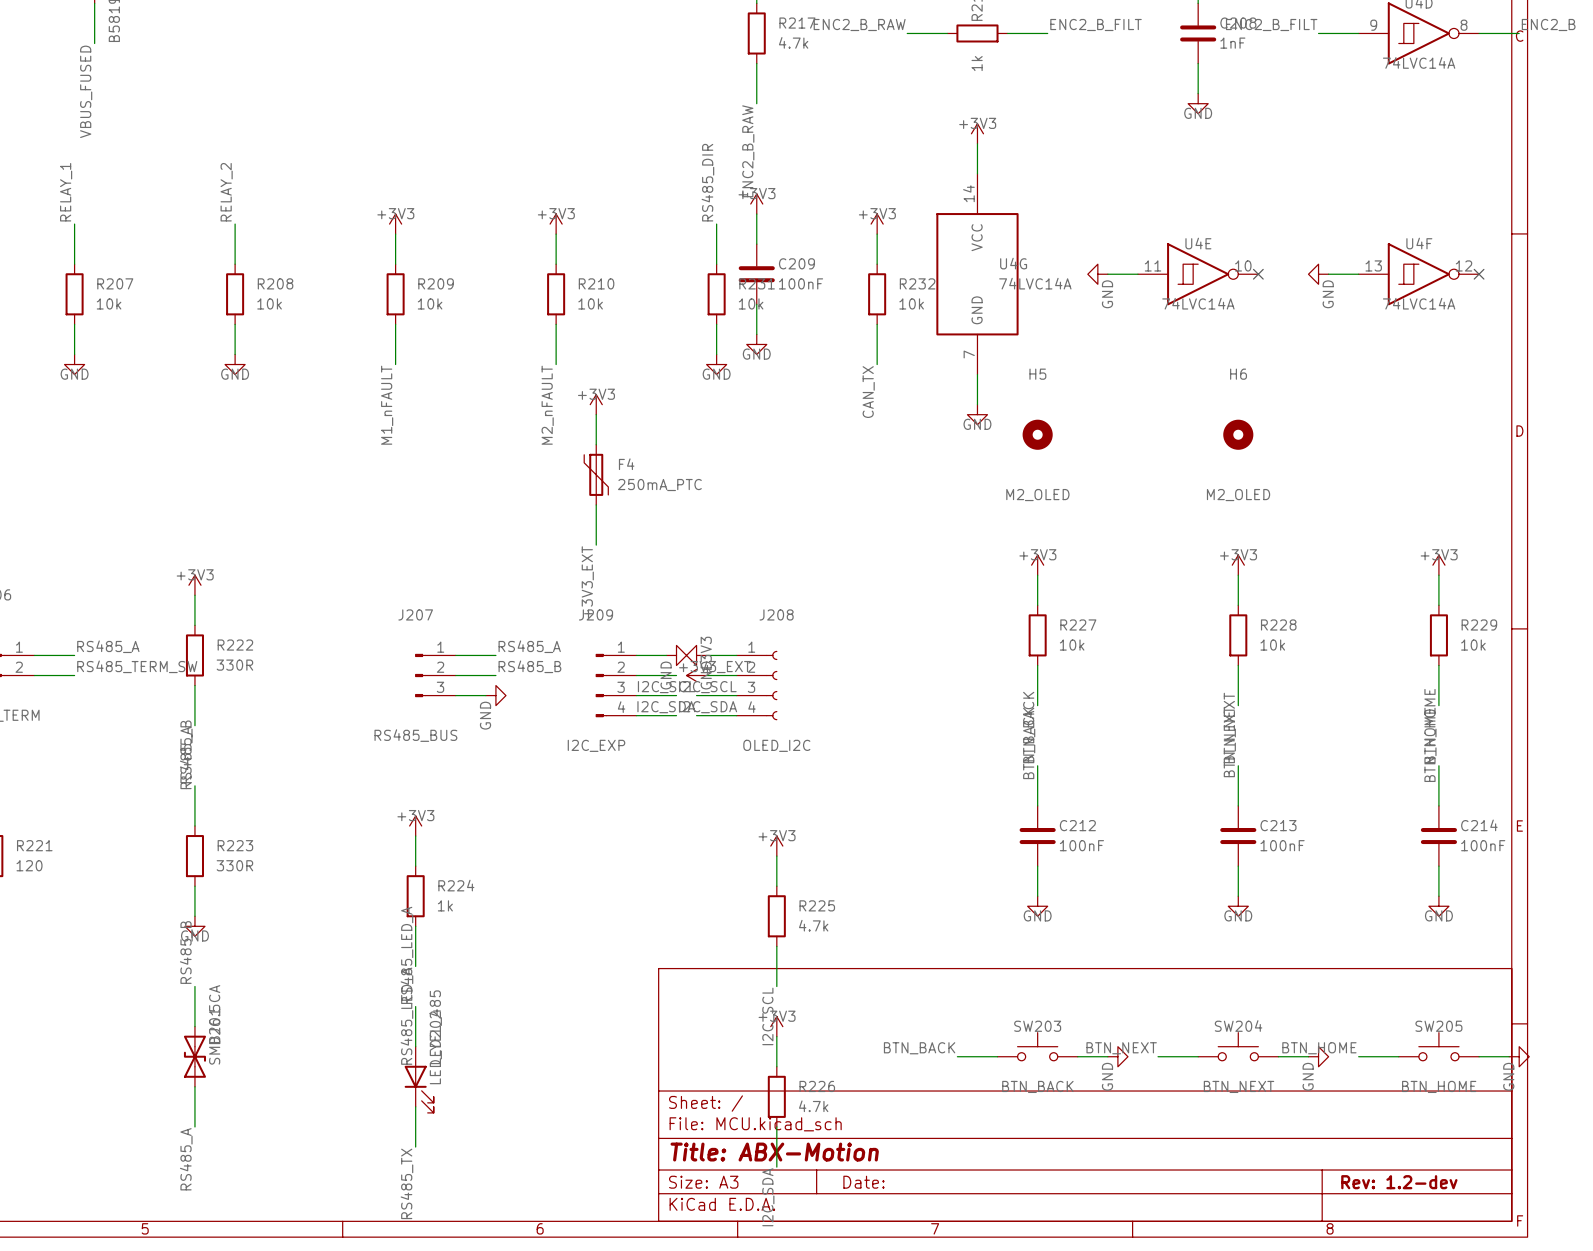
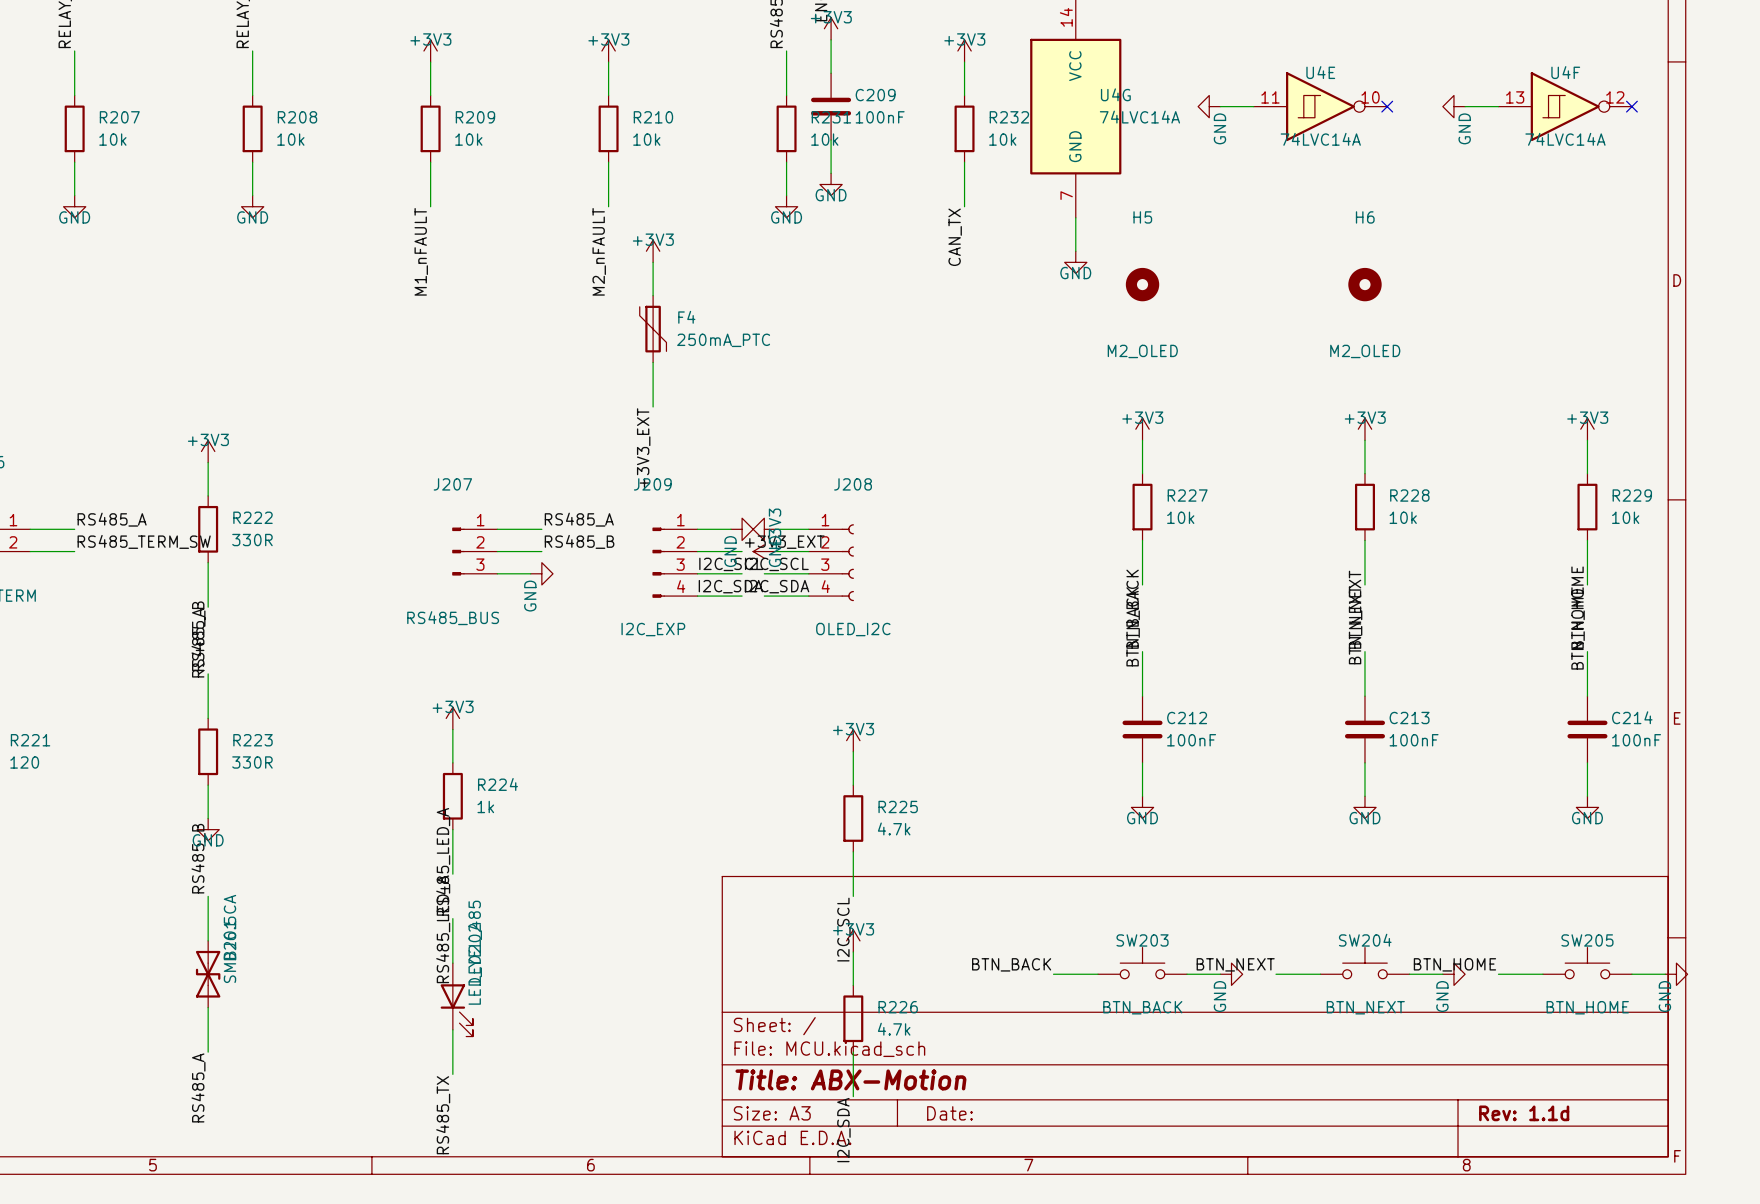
title block: Rev: 1.2-dev (1399, 1182) -> Rev: 1.1d (1524, 1113)

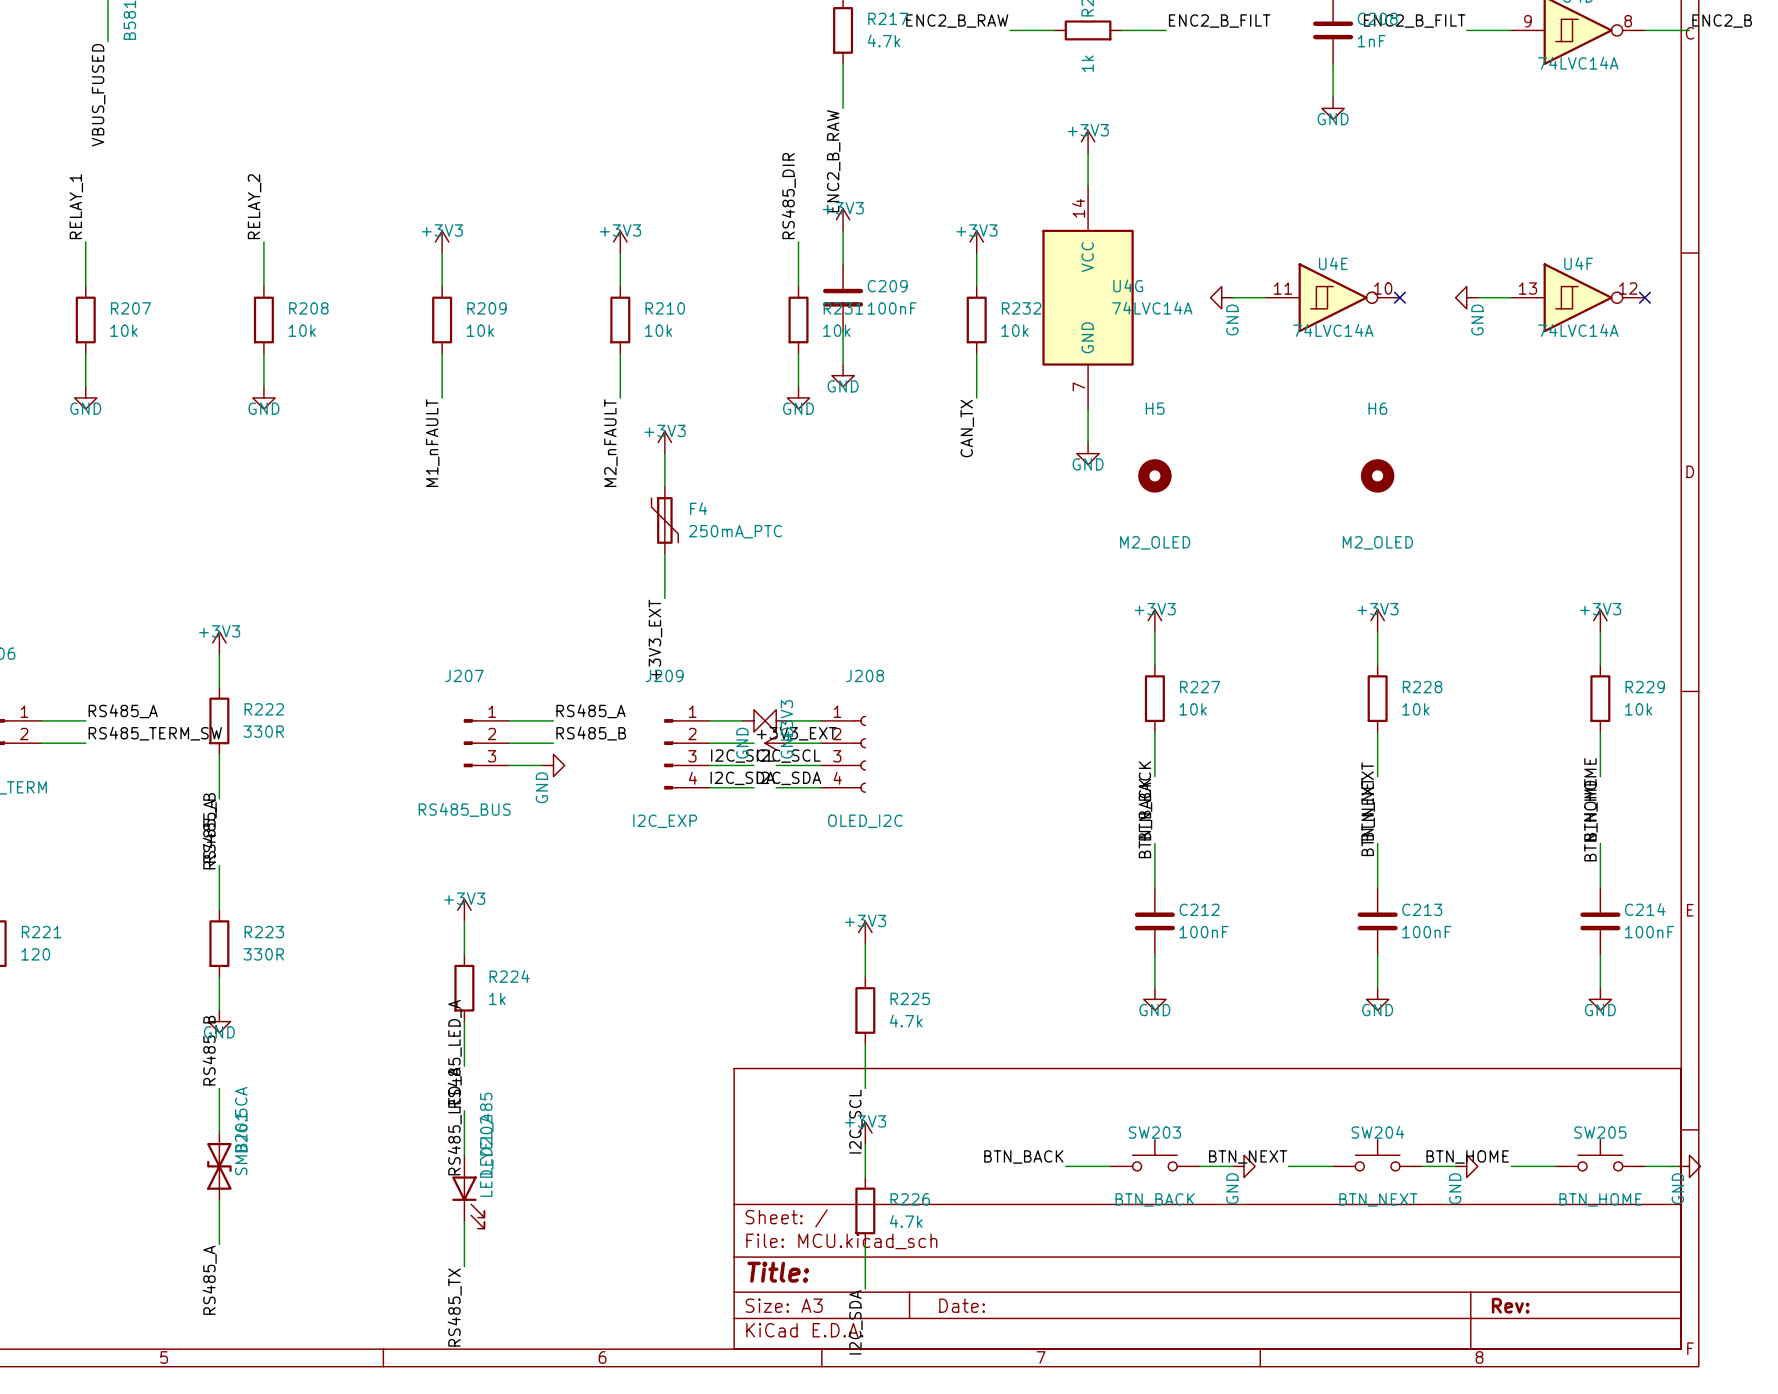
title block: Title: ABX-Motion (850, 1079) -> Title: (778, 1272)
title block: Rev: 1.1d (1524, 1113) -> Rev: (1510, 1305)

